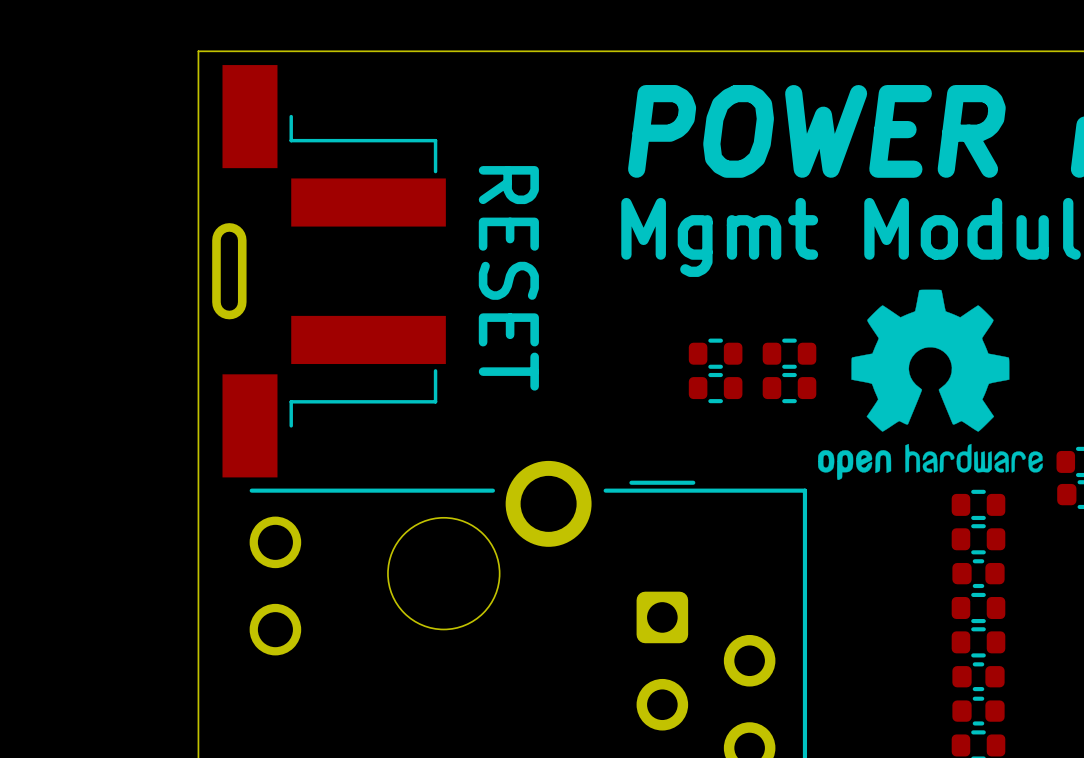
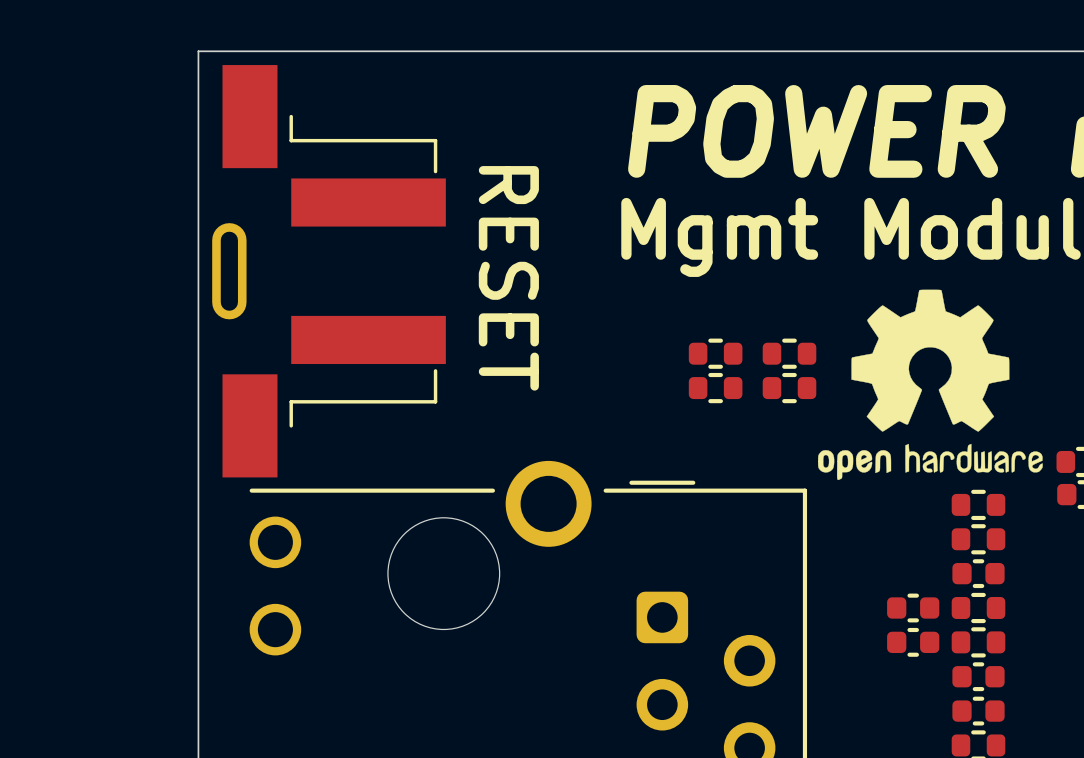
part: none -> (913, 607)
part: none -> (913, 642)

